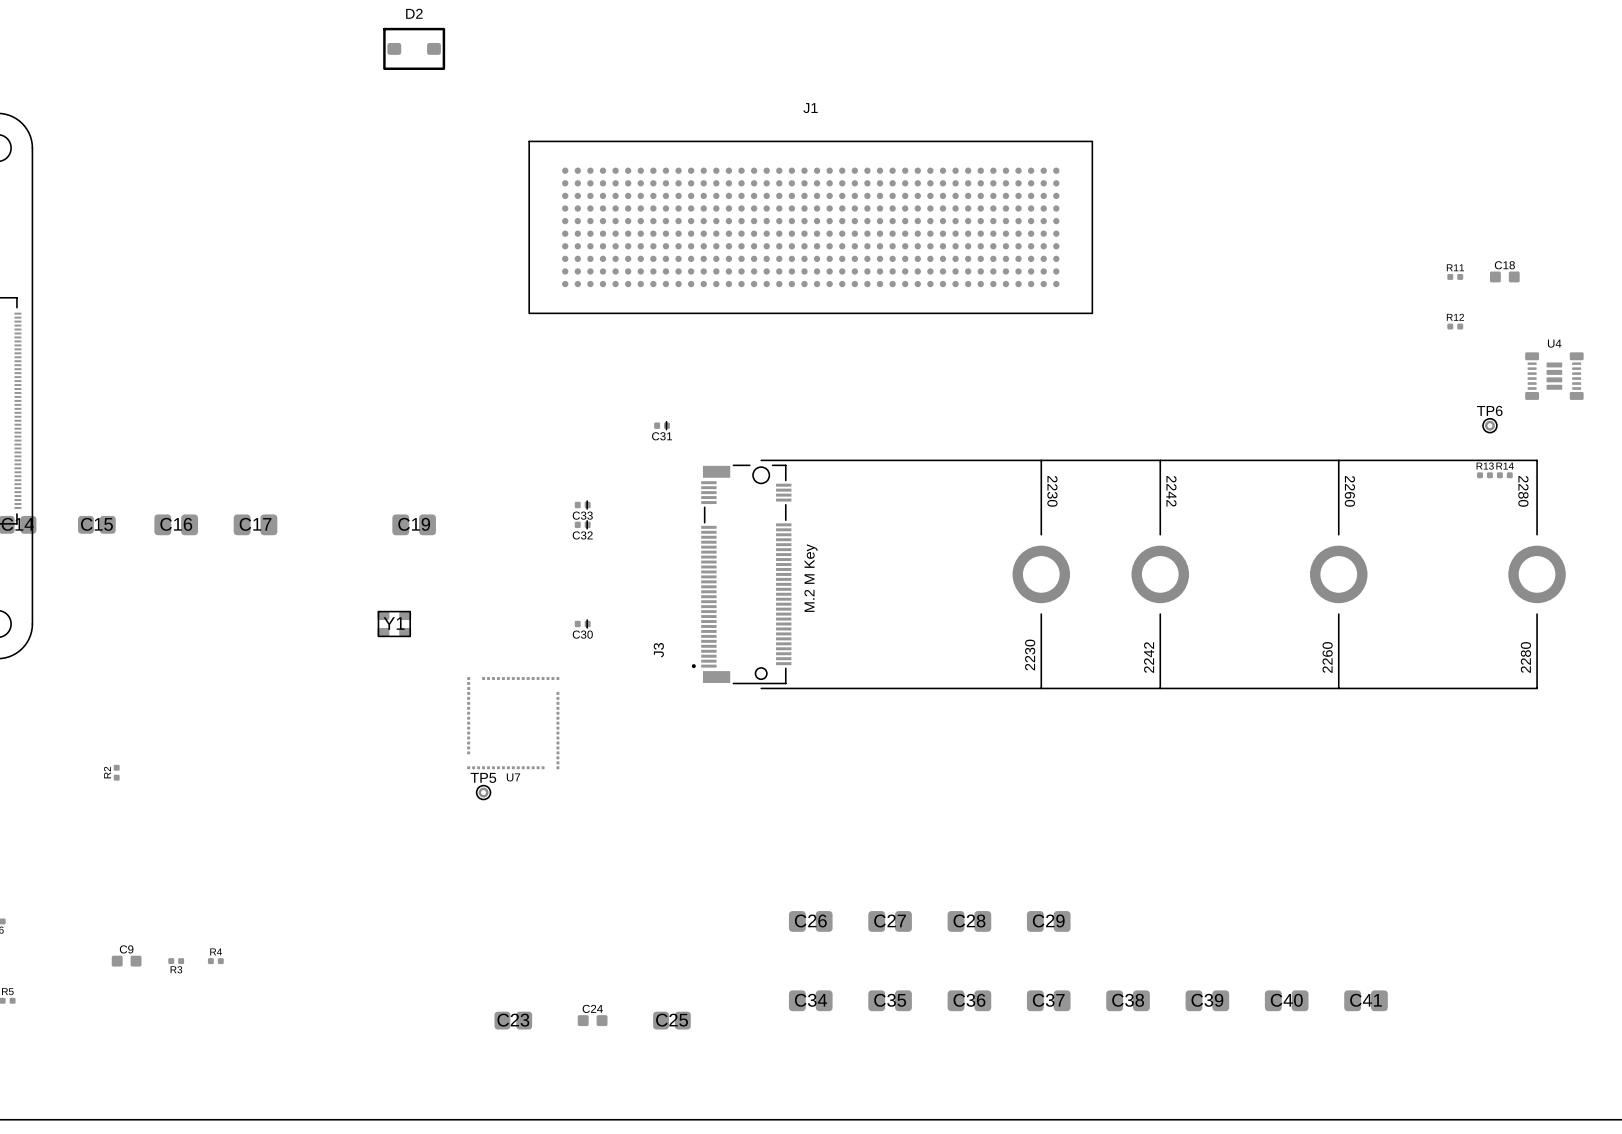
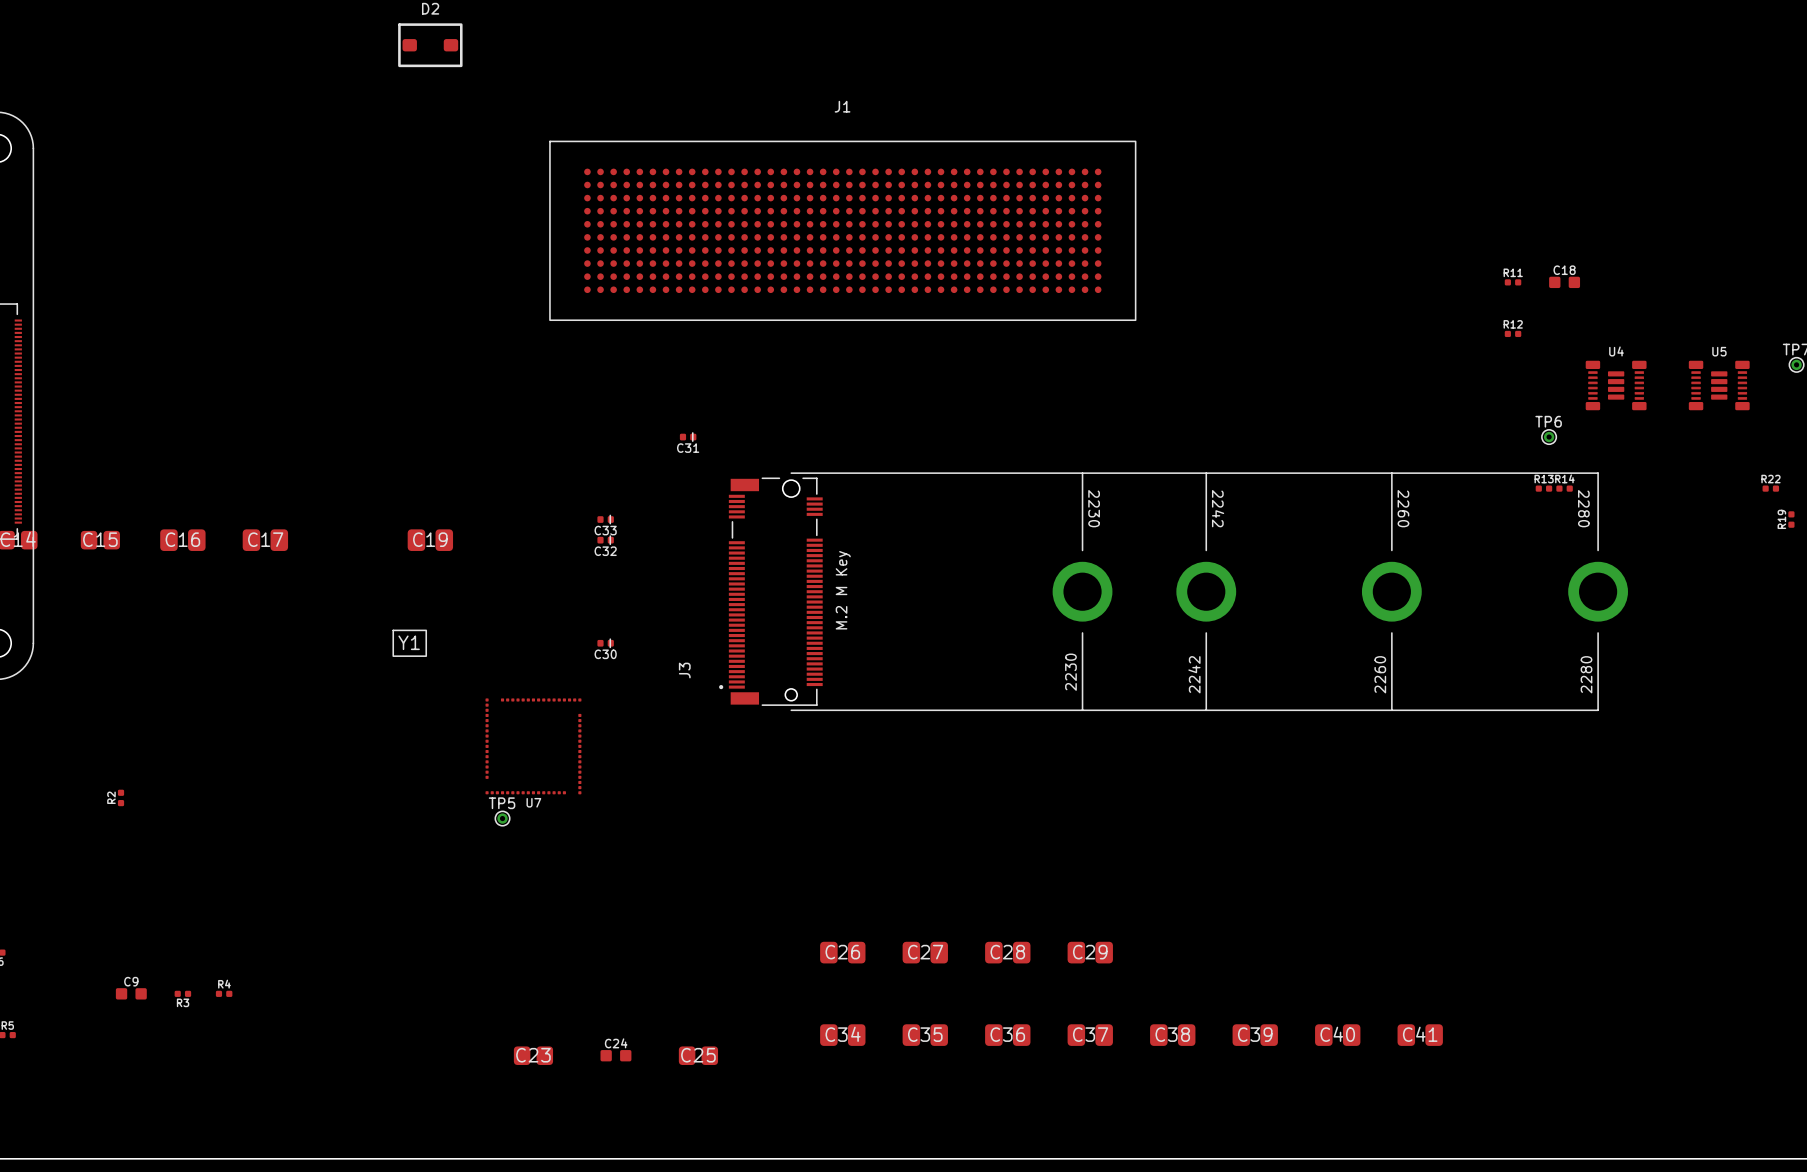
Y1 footprint: [377, 611, 412, 637] -> [392, 629, 427, 657]

